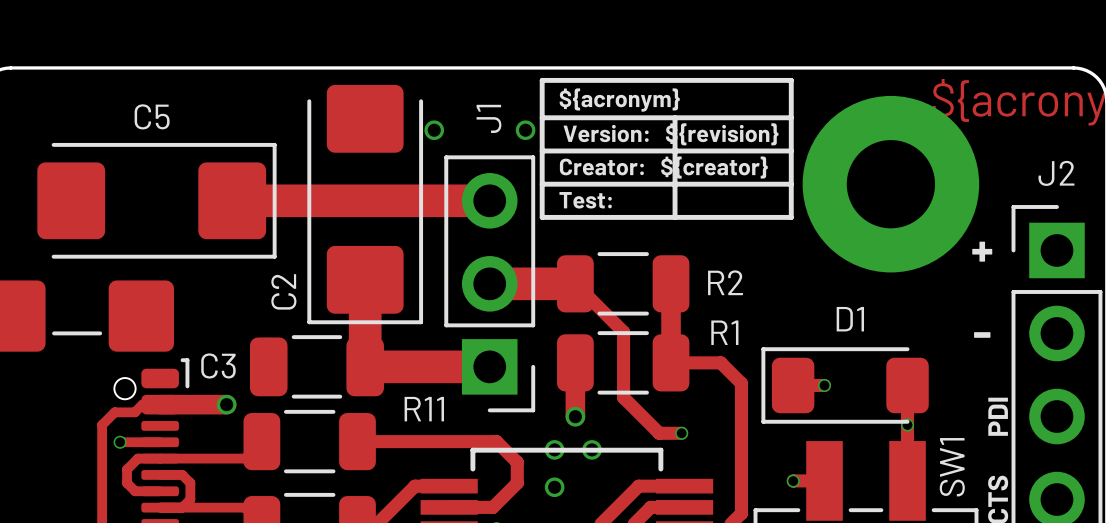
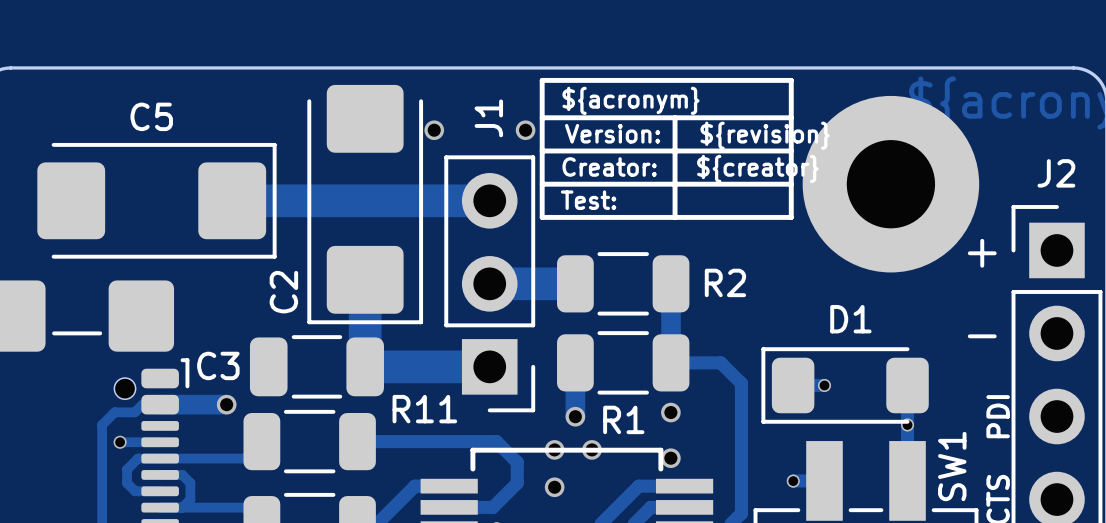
track: (575, 283) (623, 331) (623, 397) (659, 433) (681, 433) -> none
R1 name position: R1 (724, 332) -> R1 (623, 419)
via: none -> (670, 412)
via: (681, 433) -> none
via: none -> (670, 458)

